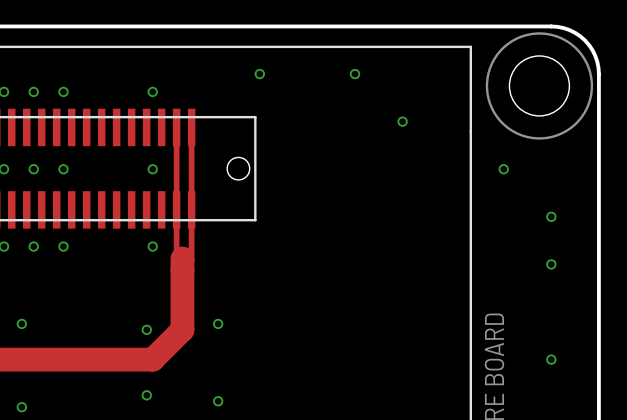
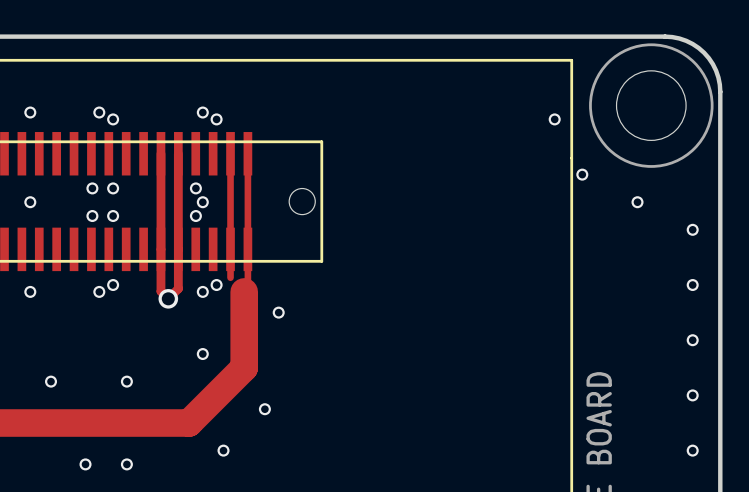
via: (259, 74) -> none
via: (355, 74) -> none
via: (33, 91) -> none
via: none -> (113, 119)
via: none -> (216, 119)
via: none -> (554, 119)
via: (402, 121) -> none
top track: none -> (160, 153) (160, 291) (168, 298) (178, 288) (178, 153)
via: none -> (582, 174)
via: none -> (92, 188)
via: none -> (113, 188)
via: none -> (195, 188)
via: (33, 169) -> none
via: (63, 169) -> none
via: (503, 169) -> none
via: none -> (637, 202)
via: none -> (92, 216)
via: none -> (113, 216)
via: none -> (195, 216)
via: none -> (692, 229)
via: (551, 216) -> none
top track: (176, 234) (176, 252) (182, 258) (182, 329) (152, 359) (140, 359) -> (247, 288) (244, 291) (244, 367) (189, 423)
via: none -> (113, 285)
via: none -> (216, 285)
via: none -> (692, 285)
via: (33, 246) -> none
via: none -> (168, 298)
via: none -> (278, 312)
via: (551, 264) -> none
via: none -> (692, 340)
via: none -> (202, 354)
via: none -> (126, 381)
via position: (218, 323) -> (264, 409)
via: (146, 329) -> none
via: none -> (692, 395)
via: (551, 359) -> none
via: none -> (223, 450)
via: none -> (692, 450)
via: none -> (126, 464)
via: (146, 395) -> none
via: (218, 401) -> none
via position: (21, 407) -> (85, 464)

